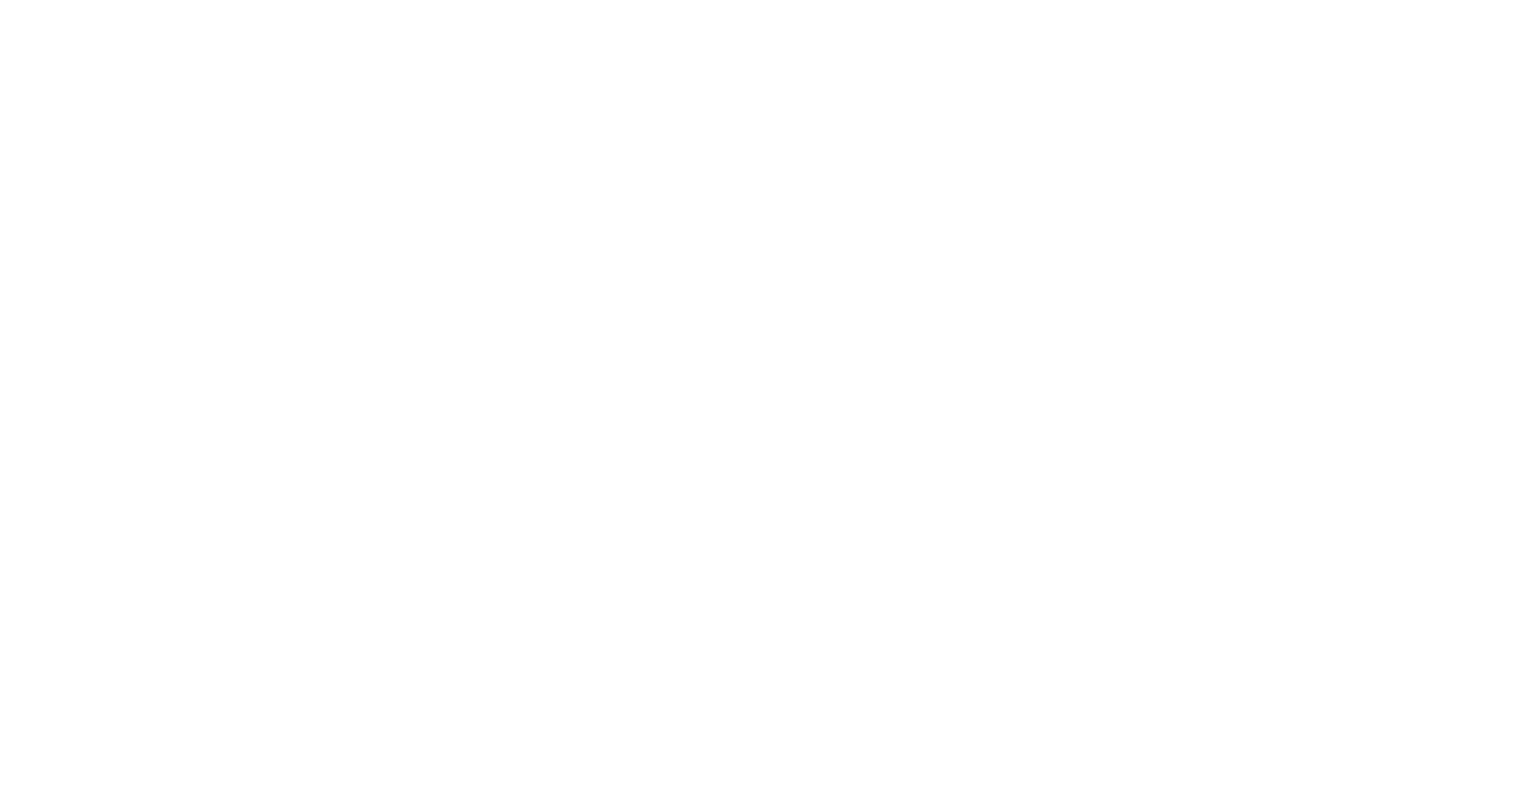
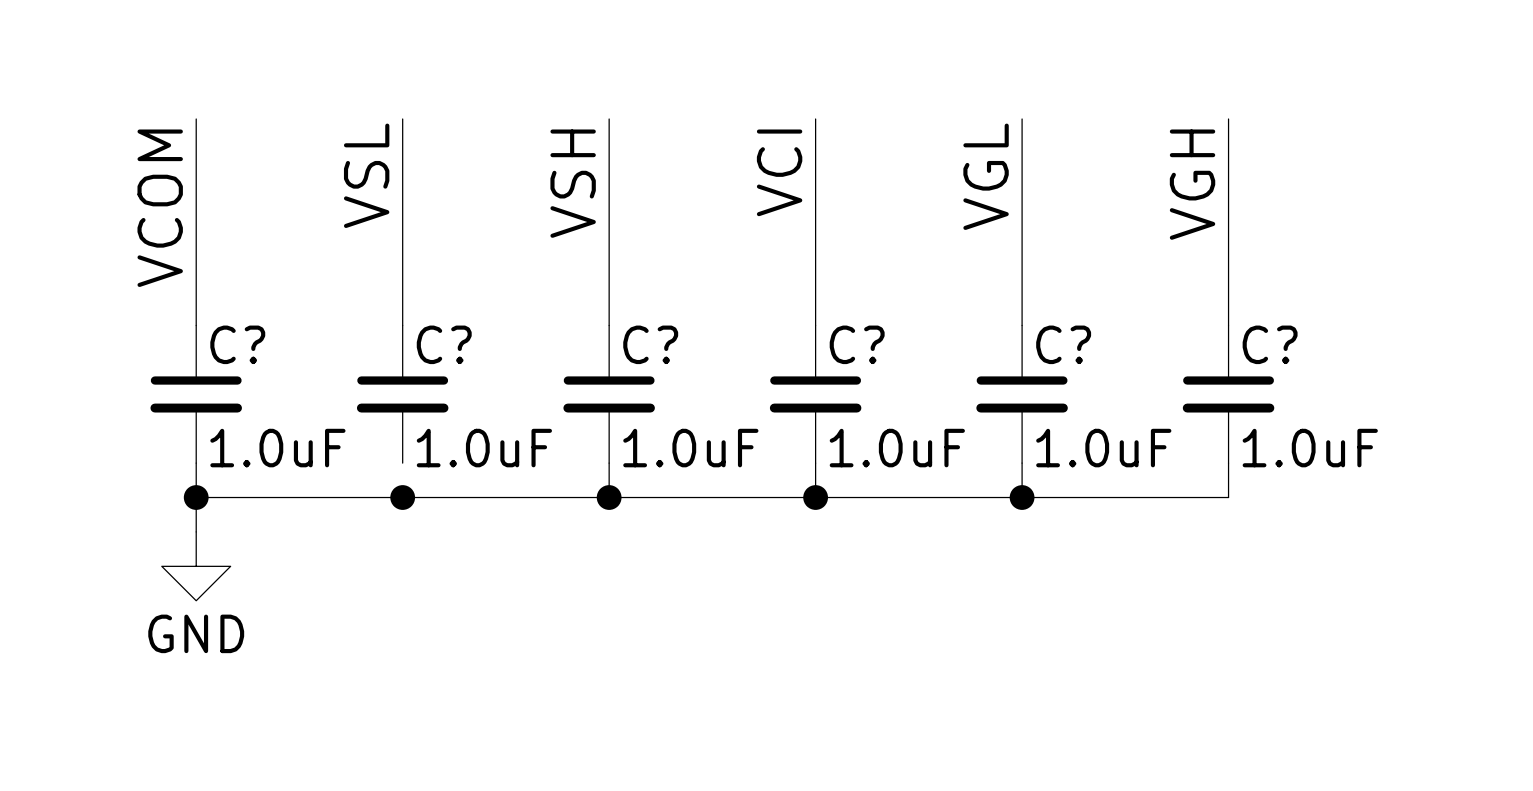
wire: none -> (196, 118) (196, 325)
wire: none -> (402, 118) (402, 325)
wire: none -> (609, 118) (609, 325)
wire: none -> (815, 118) (815, 325)
wire: none -> (1022, 118) (1022, 325)
wire: none -> (1228, 118) (1228, 325)
label: none -> VCI (779, 172)
label: none -> VSL (366, 175)
label: none -> VGL (986, 176)
label: none -> VSH (573, 183)
label: none -> VGH (1192, 184)
label: none -> VCOM (160, 208)
C?: none -> 1.0uF (196, 394)
C?: none -> 1.0uF (402, 394)
C?: none -> 1.0uF (609, 394)
C?: none -> 1.0uF (815, 394)
C?: none -> 1.0uF (1022, 394)
C?: none -> 1.0uF (1228, 394)
wire: none -> (196, 463) (196, 531)
wire: none -> (609, 463) (609, 497)
wire: none -> (815, 463) (815, 497)
wire: none -> (1022, 463) (1022, 497)
wire: none -> (1228, 463) (1228, 497) (196, 497)
junction: none -> (196, 497)
junction: none -> (402, 497)
junction: none -> (609, 497)
junction: none -> (815, 497)
junction: none -> (1022, 497)
power symbol: none -> GND (196, 566)

